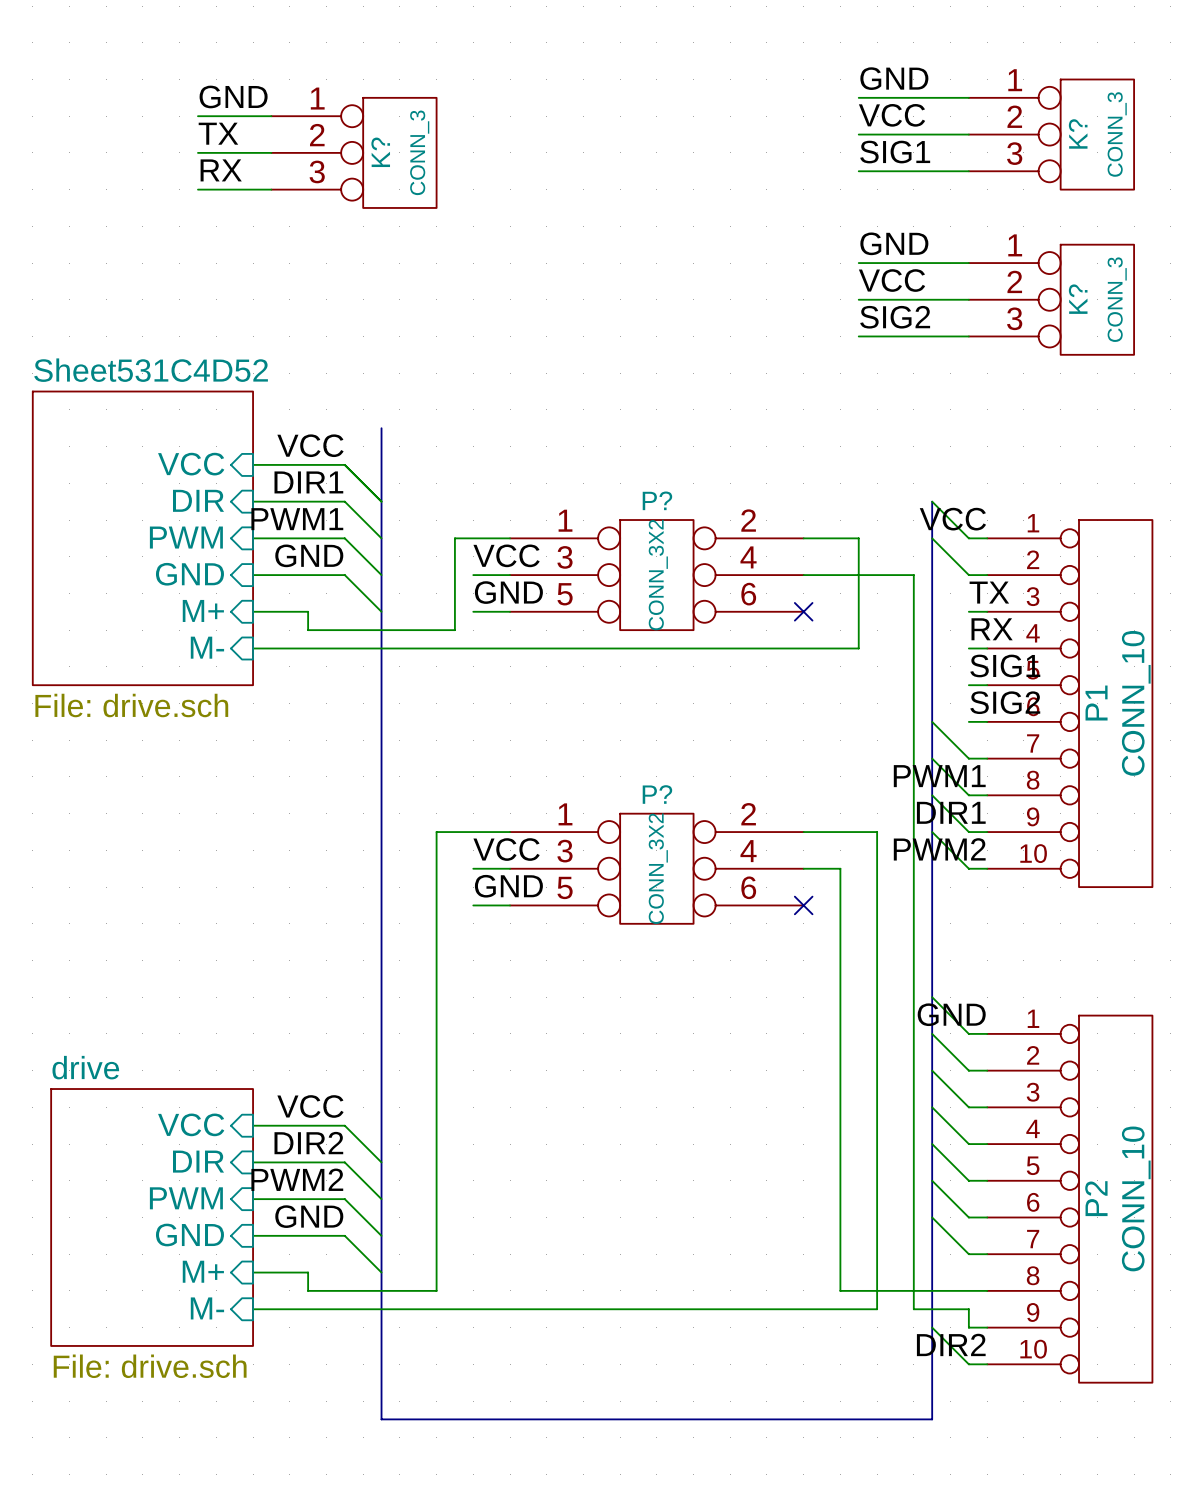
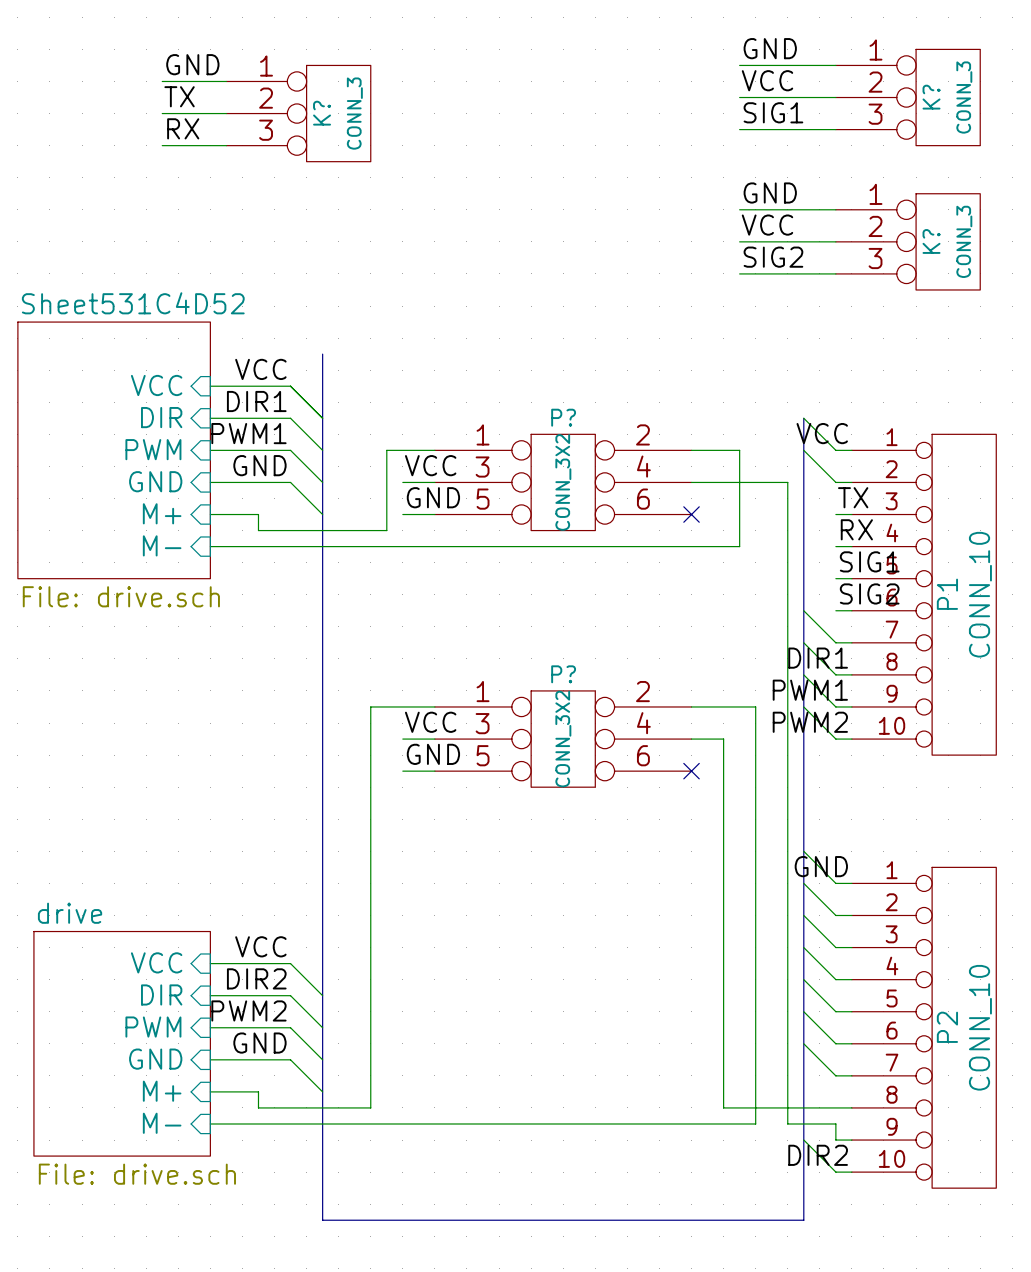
label: PWM1 (939, 776) -> DIR1 (818, 658)
label: DIR1 (951, 812) -> PWM1 (810, 690)

